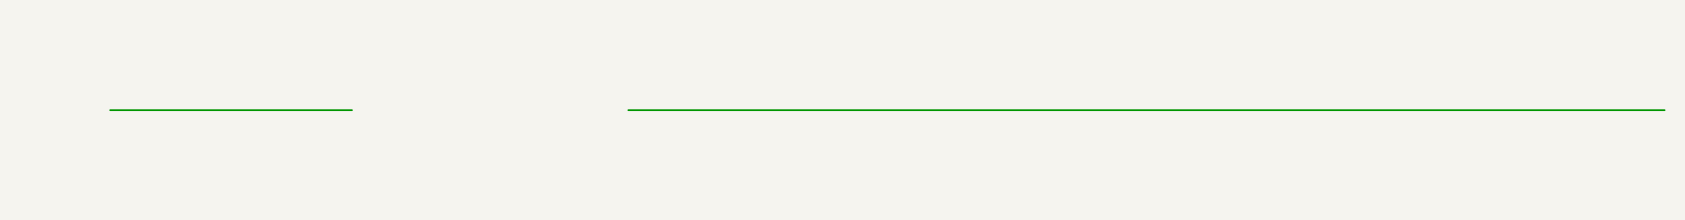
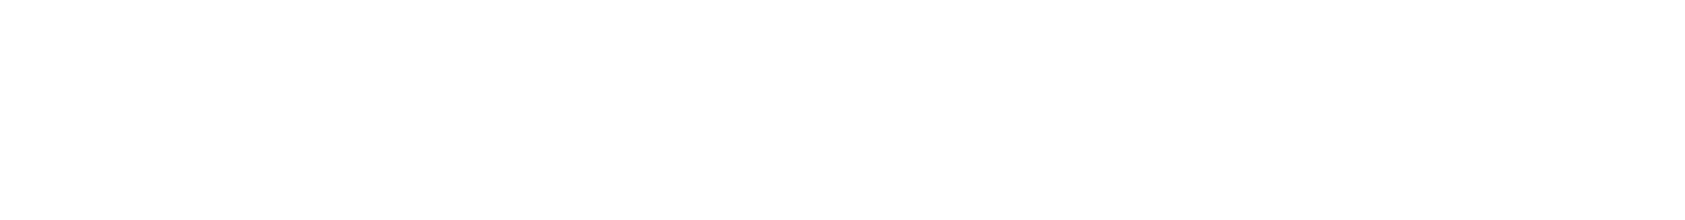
wire: (110, 110) (351, 110) -> none
wire: (628, 110) (1664, 110) -> none

